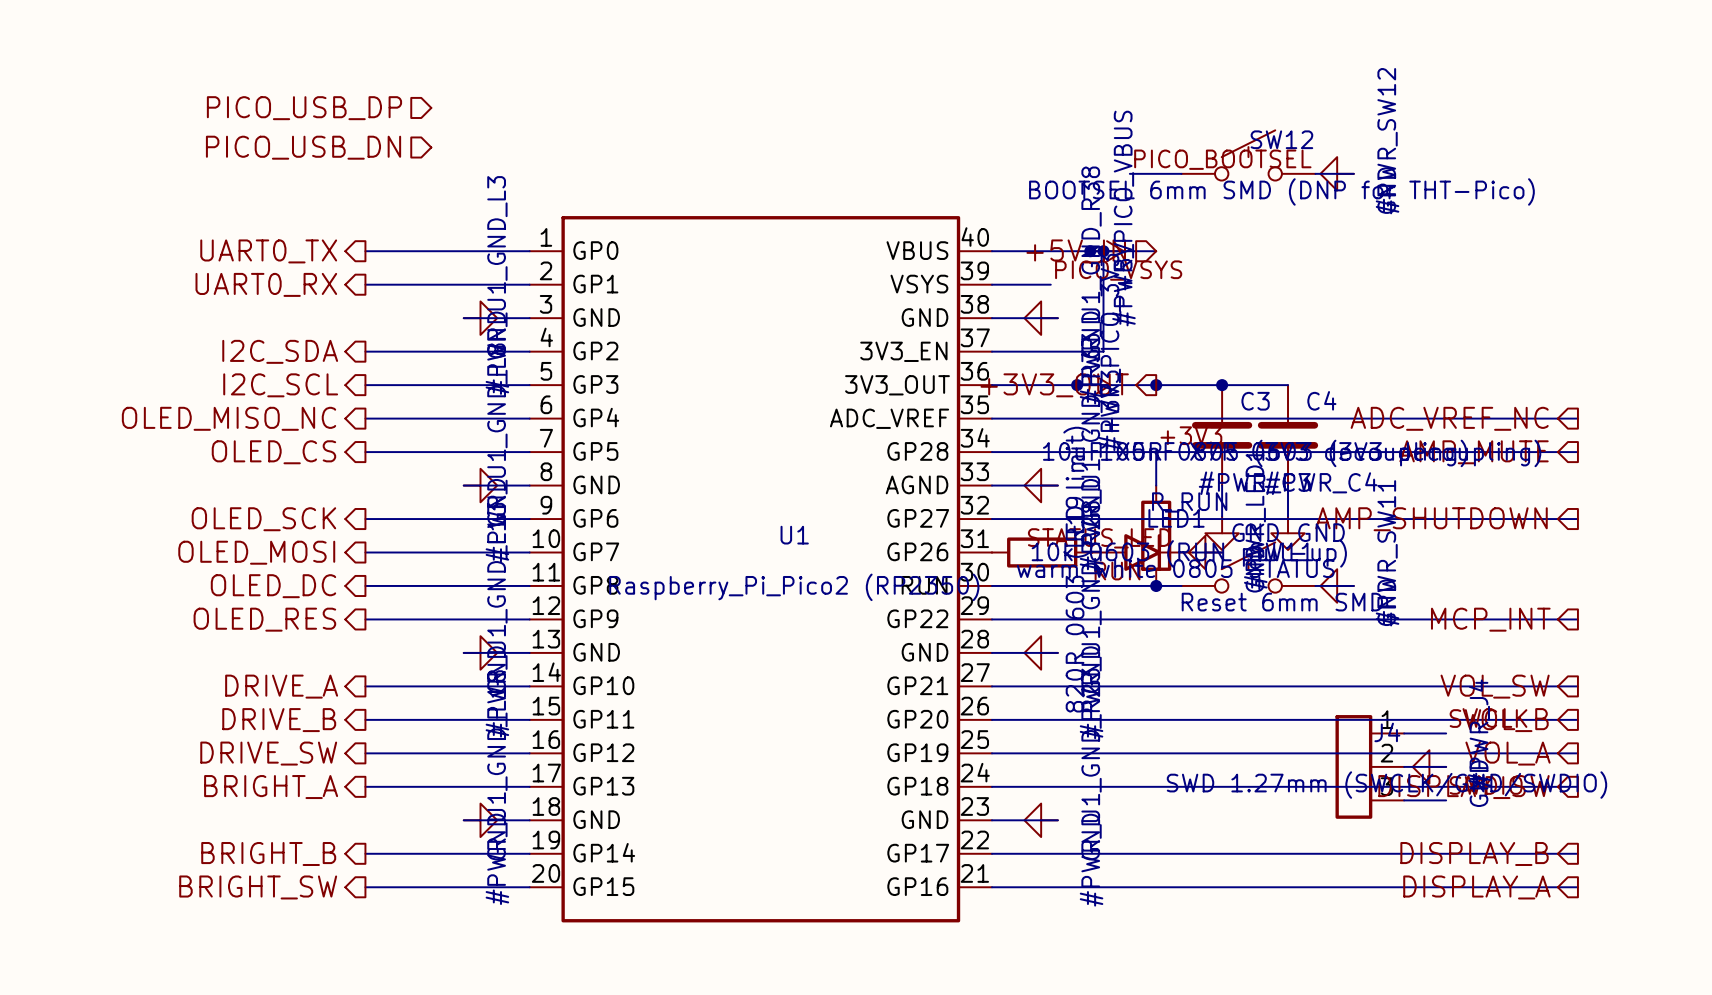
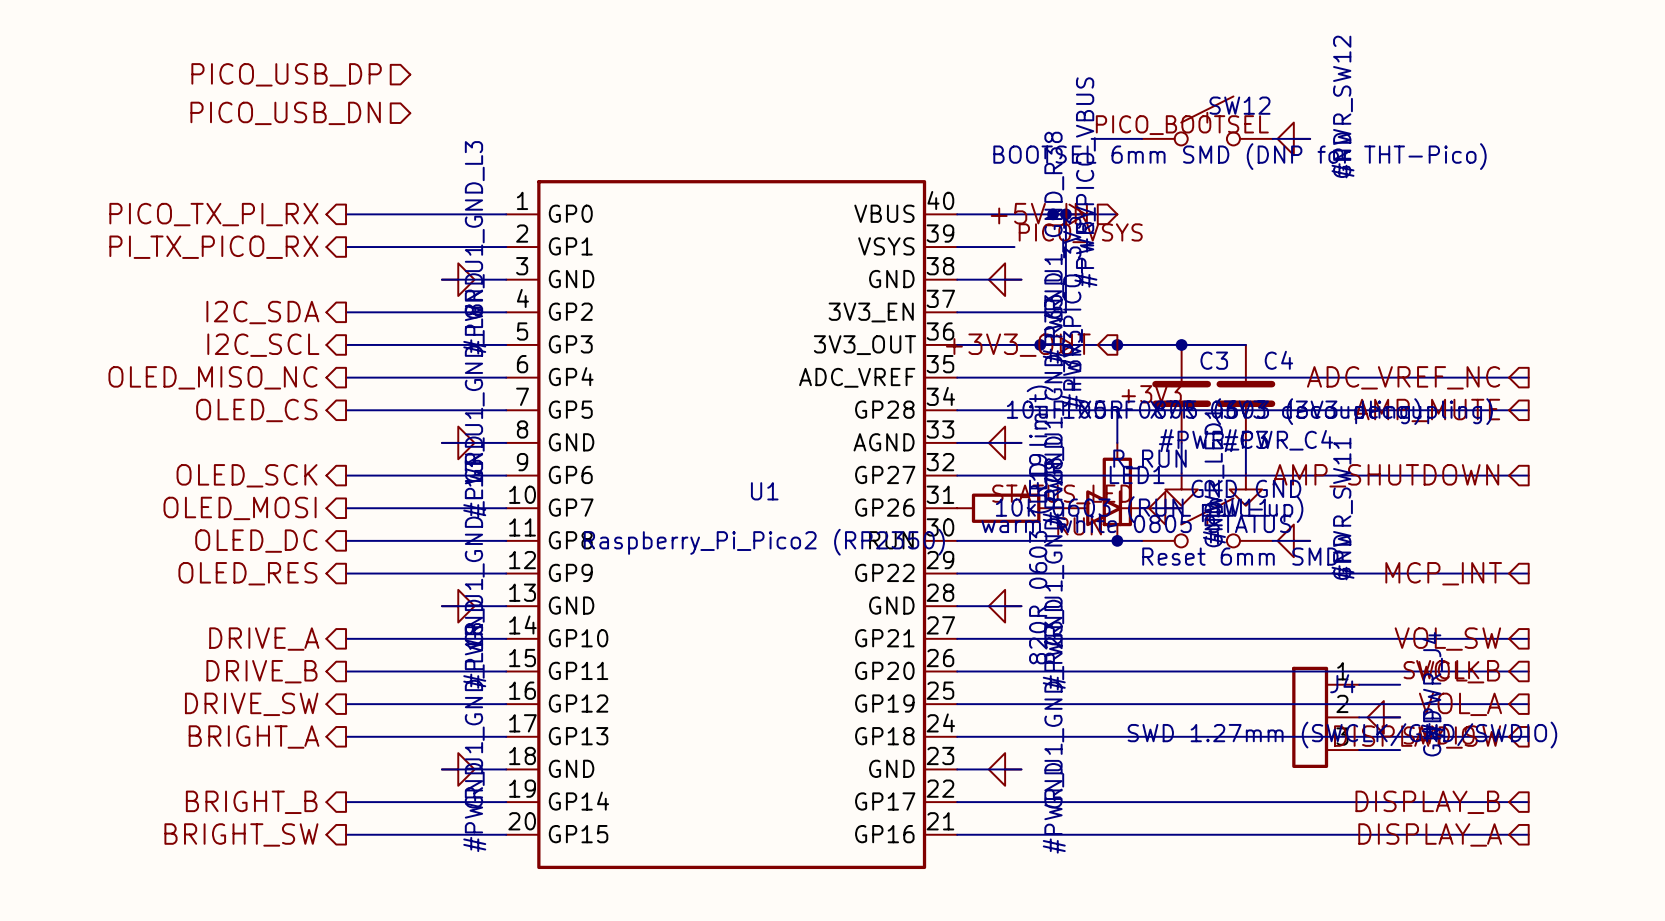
hierarchical label: UART0_TX (268, 251) -> PICO_TX_PI_RX (213, 214)
hierarchical label: UART0_RX (266, 284) -> PI_TX_PICO_RX (213, 247)

